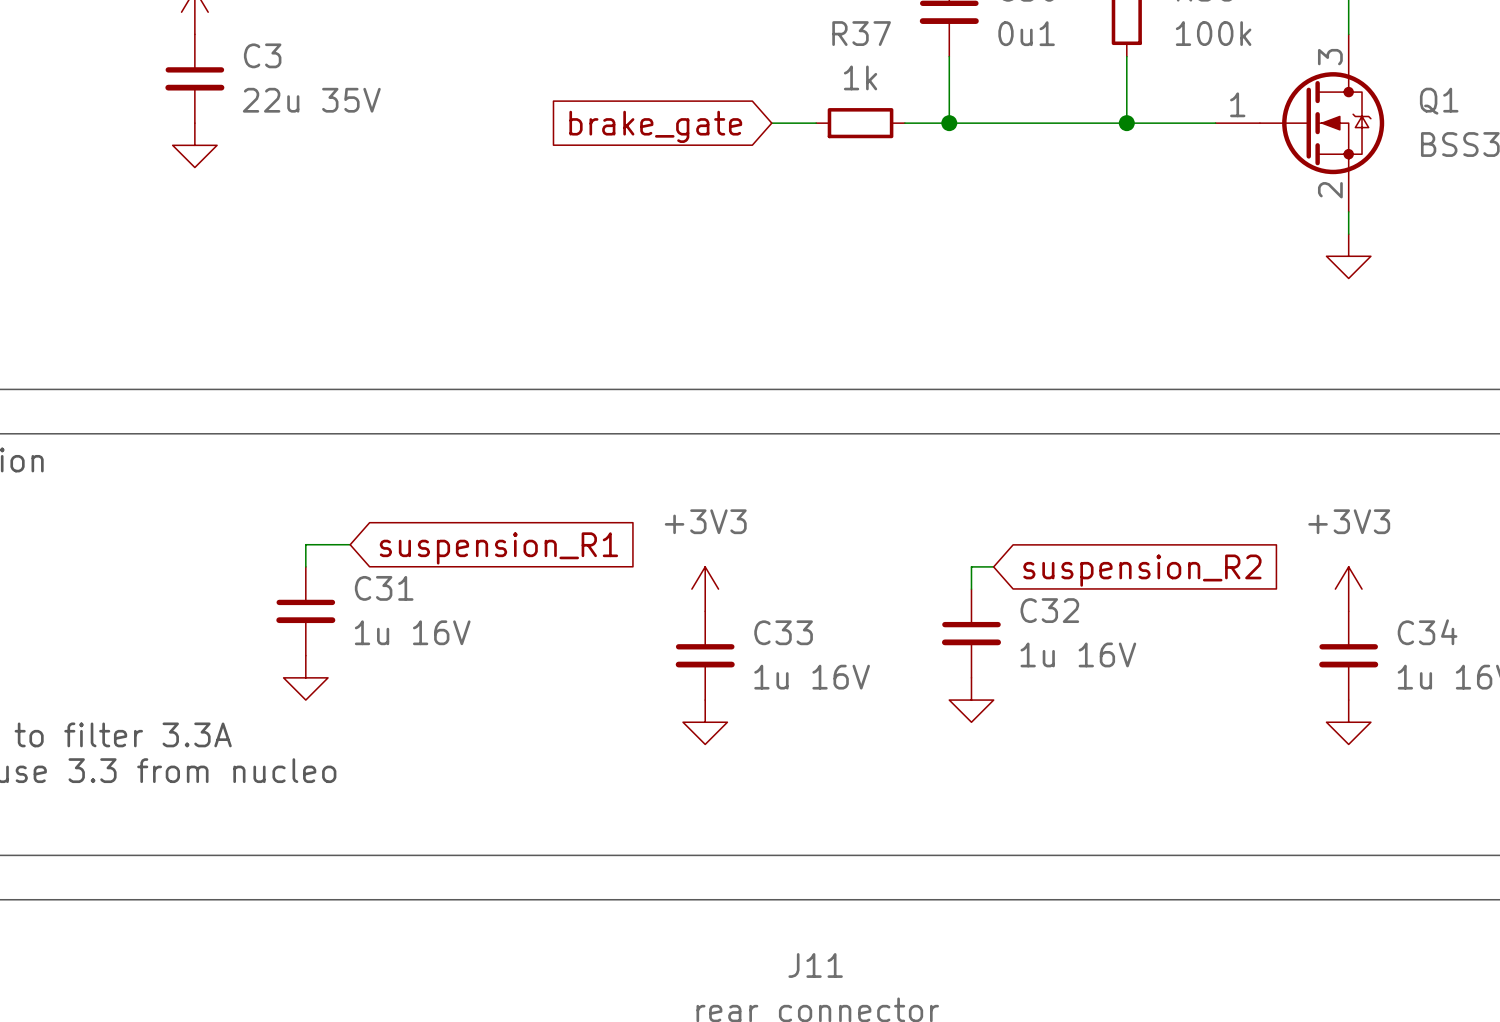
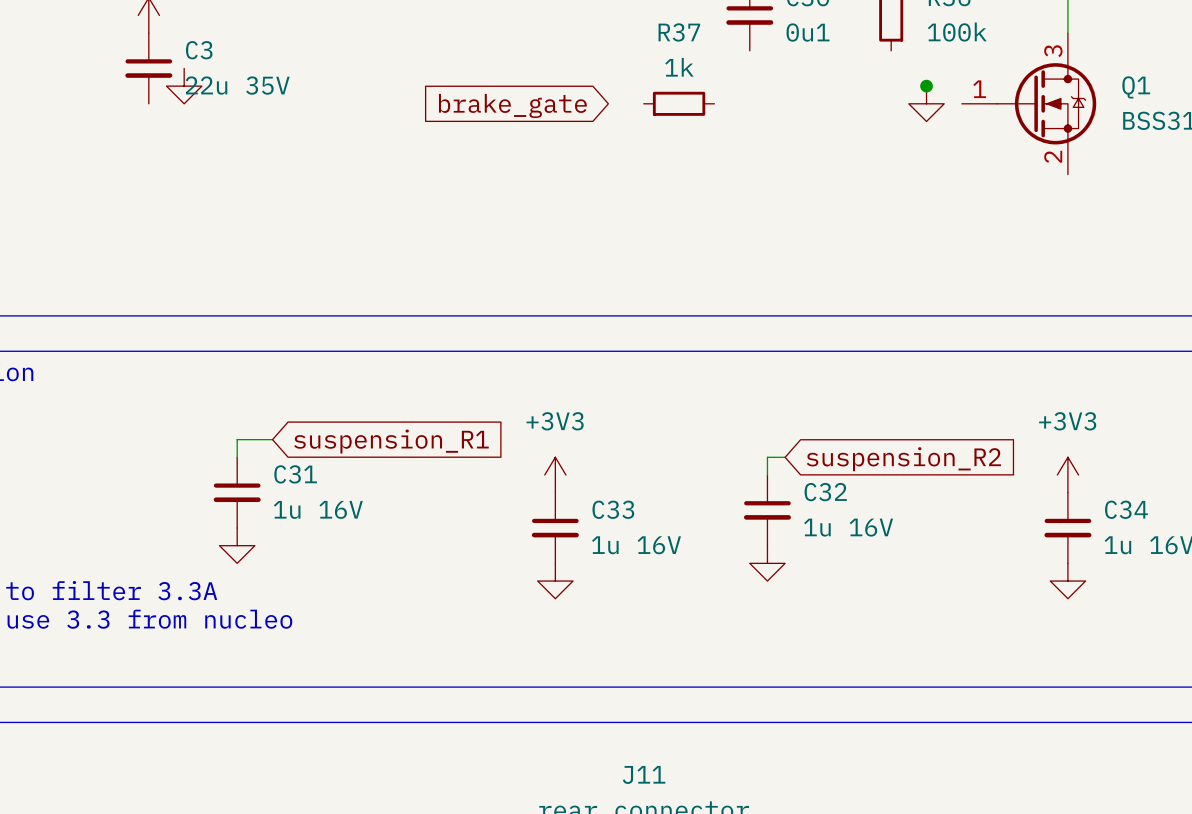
wire: (949, 56) (949, 123) -> none
wire: (1126, 56) (1126, 123) -> none
wire: (771, 123) (816, 123) -> none
wire: (904, 123) (1215, 123) -> none
junction: (949, 123) -> none
junction position: (1126, 123) -> (926, 86)
power symbol position: (194, 145) -> (184, 86)
wire: (1348, 211) (1348, 234) -> none
power symbol position: (1348, 256) -> (926, 103)

